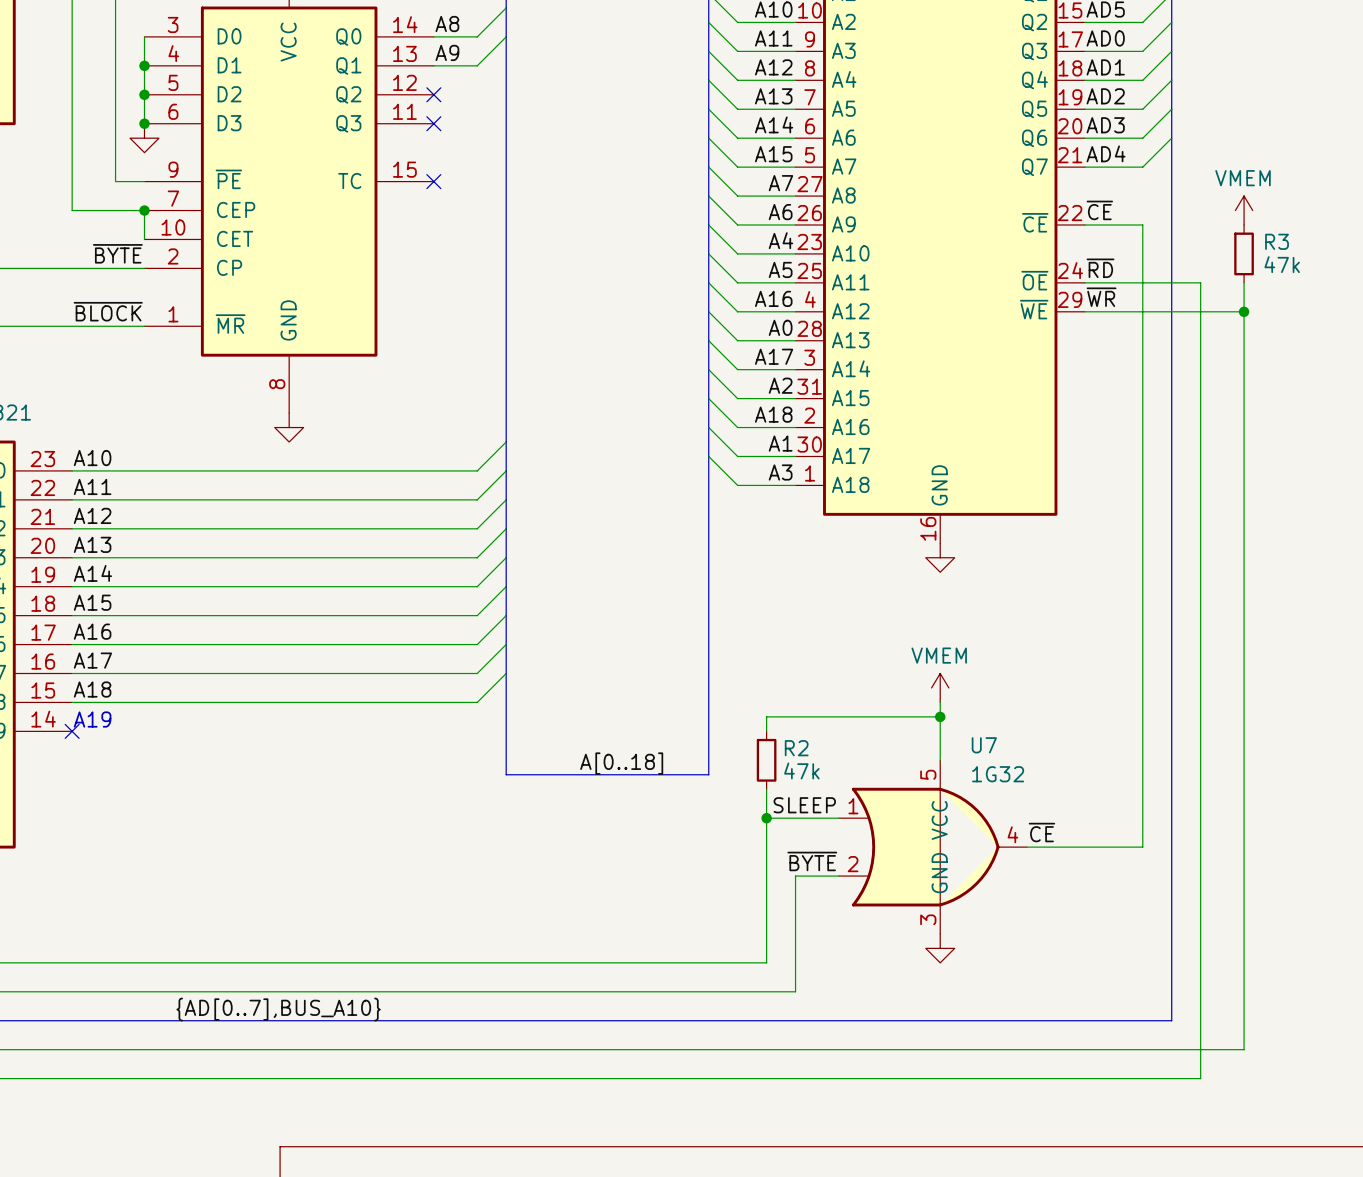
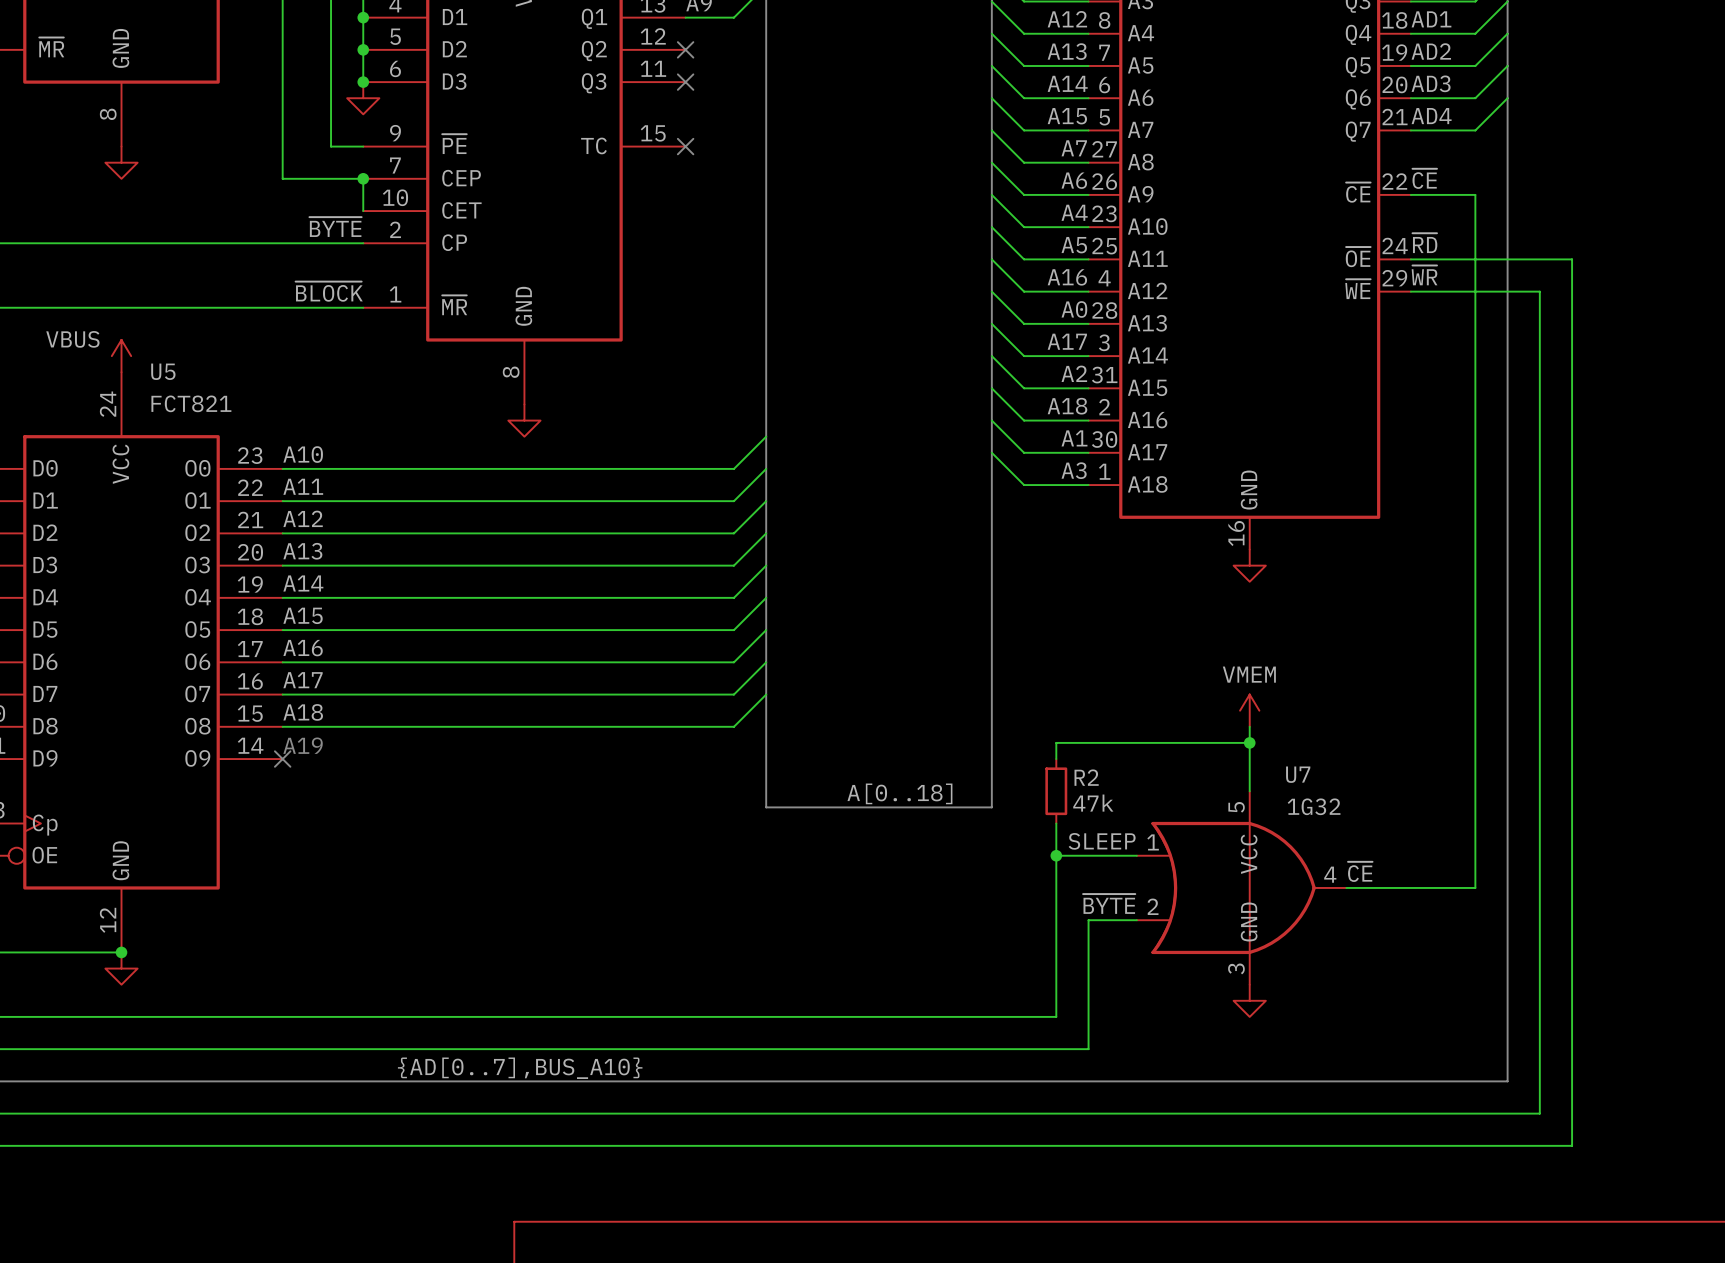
power symbol: VMEM (1244, 210) -> none
R3: 47k (1244, 253) -> none
wire: (1200, 282) (1200, 311) (1244, 311) -> none
wire: (1244, 282) (1244, 1049) (1200, 1049) (1200, 1078) -> (1539, 259) (1572, 259) (1572, 1145) (1539, 1145)
junction: (1244, 311) -> none

